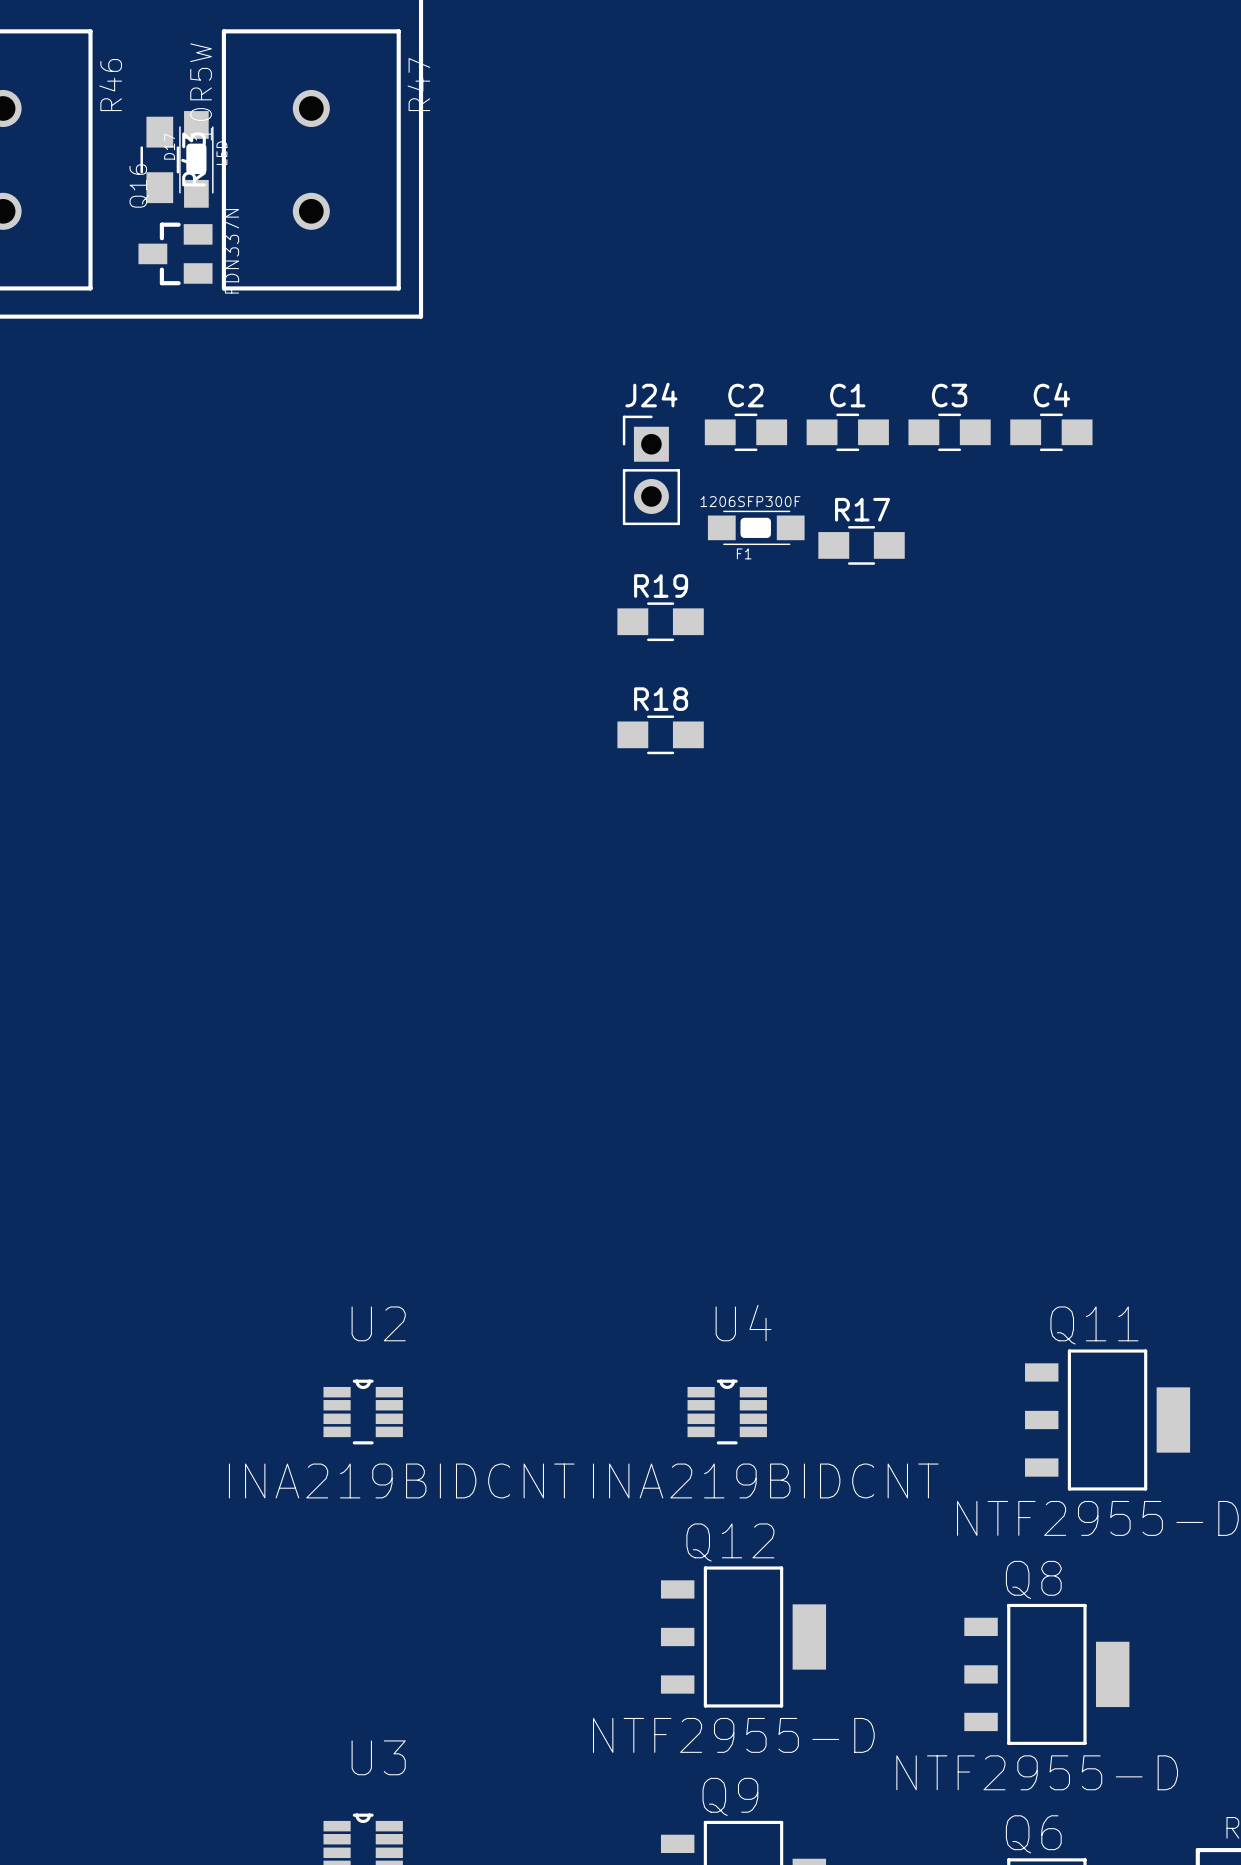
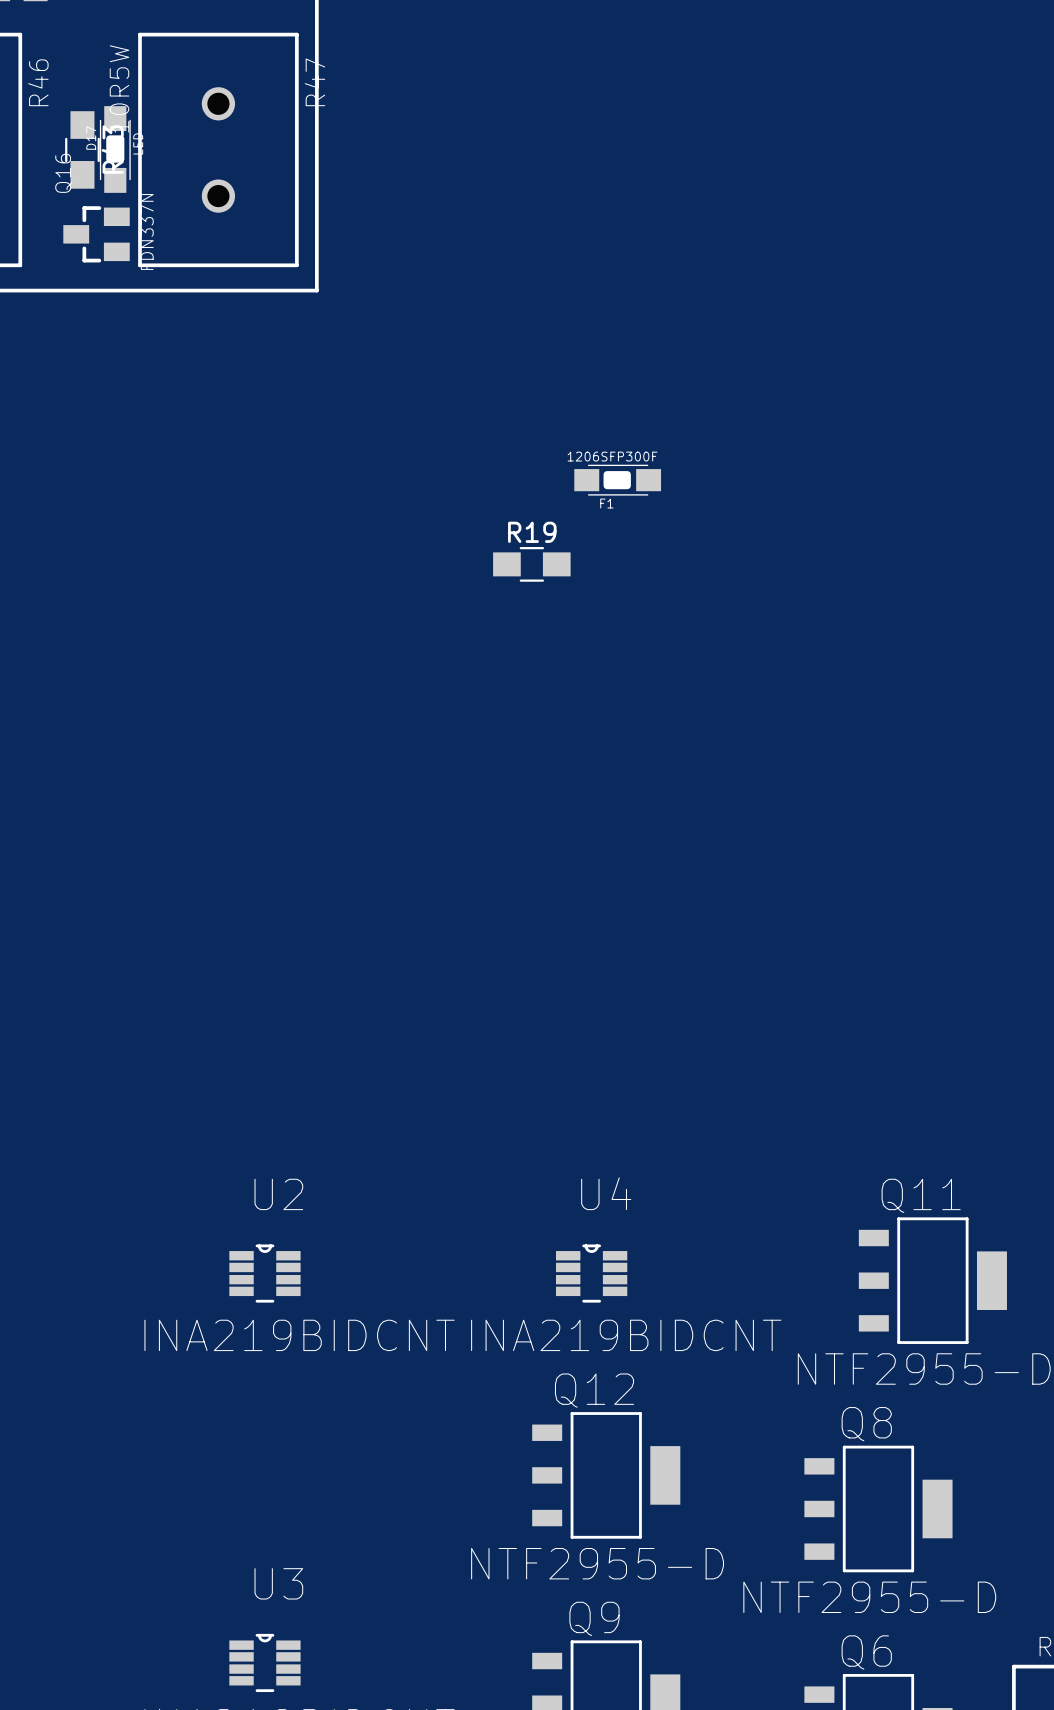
C2: (745, 432) -> none
C1: (847, 432) -> none
C3: (949, 432) -> none
C4: (1051, 432) -> none
J24: (651, 470) -> none
R17: (861, 545) -> none
R18: (660, 734) -> none

